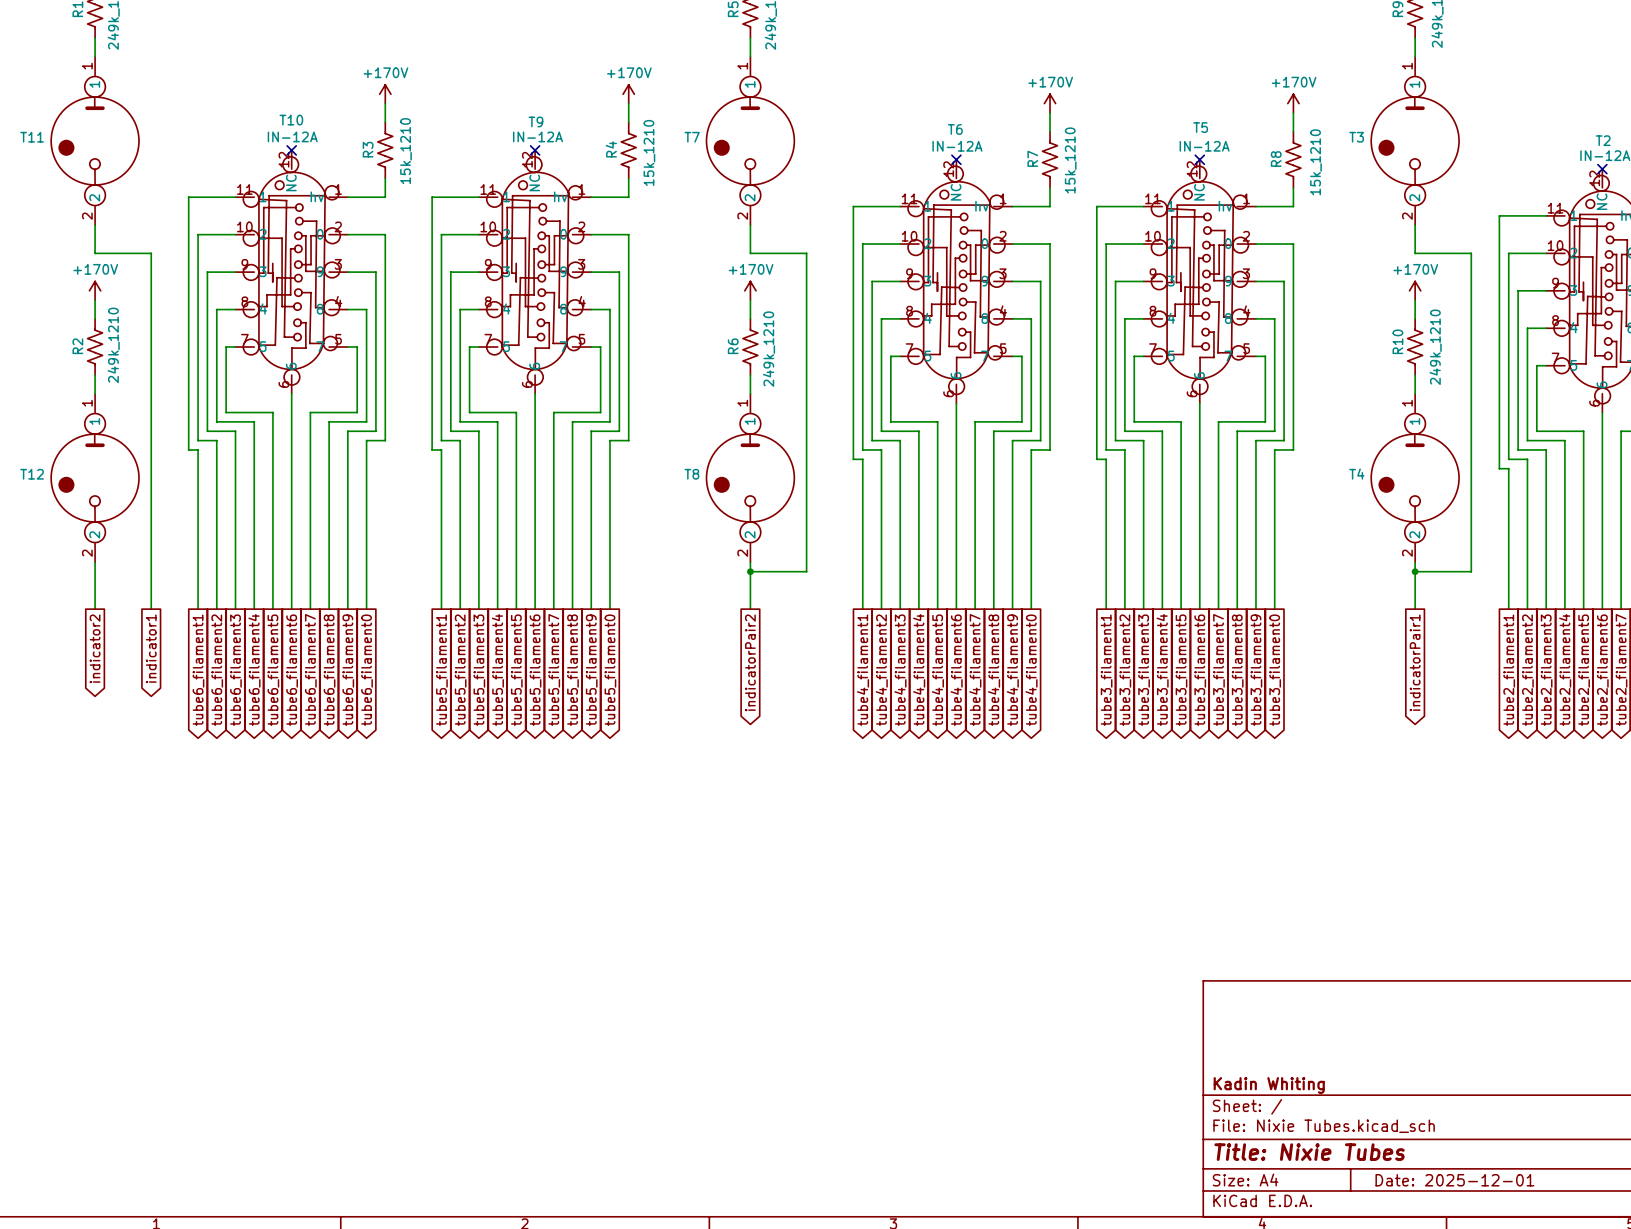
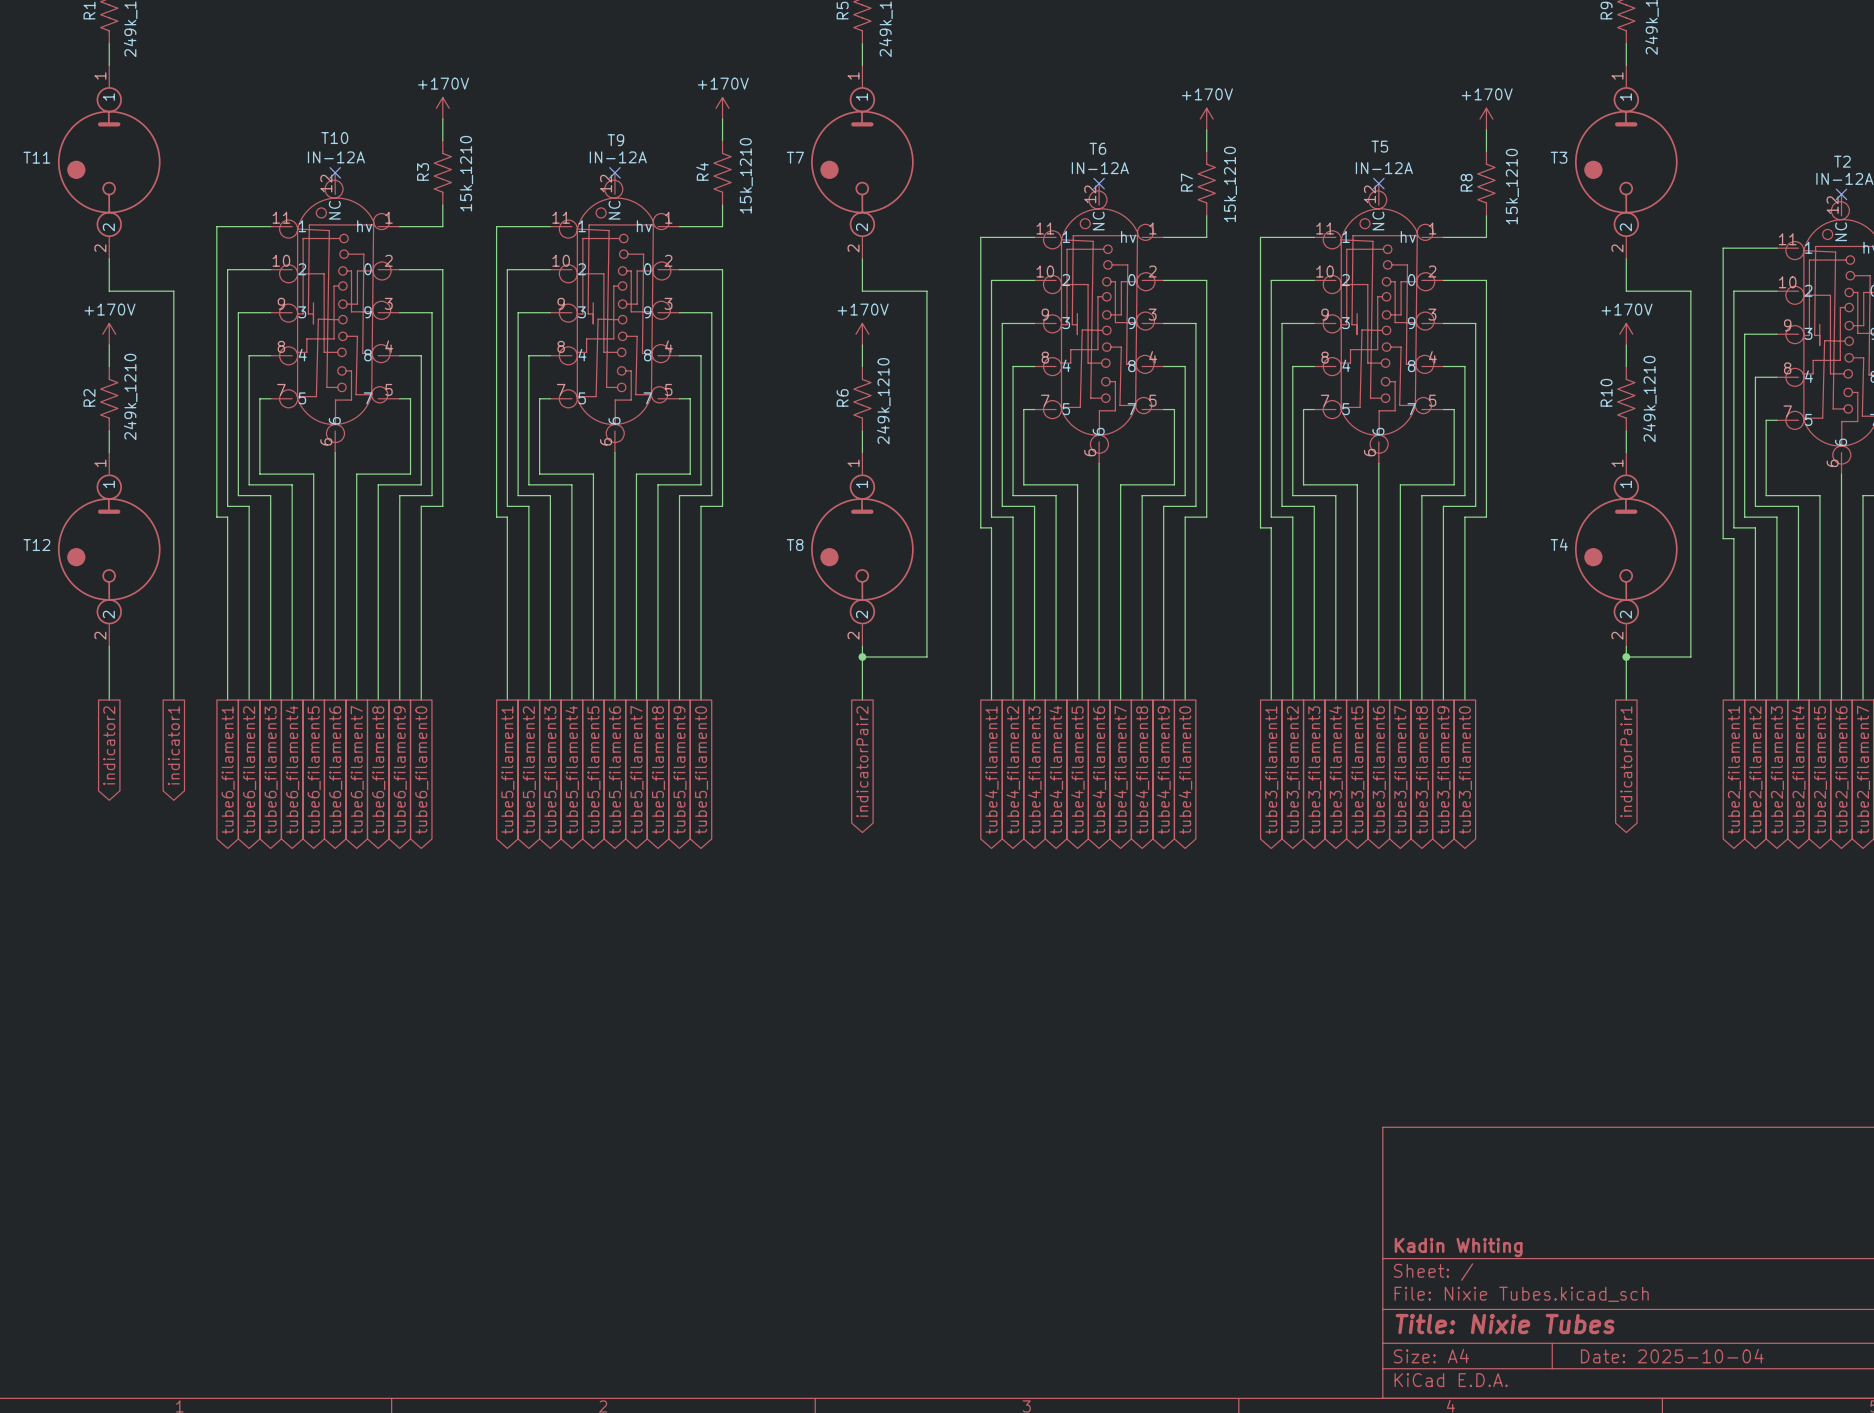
title block: Date: 2025-12-01 (1454, 1180) -> Date: 2025-10-04 (1672, 1356)

